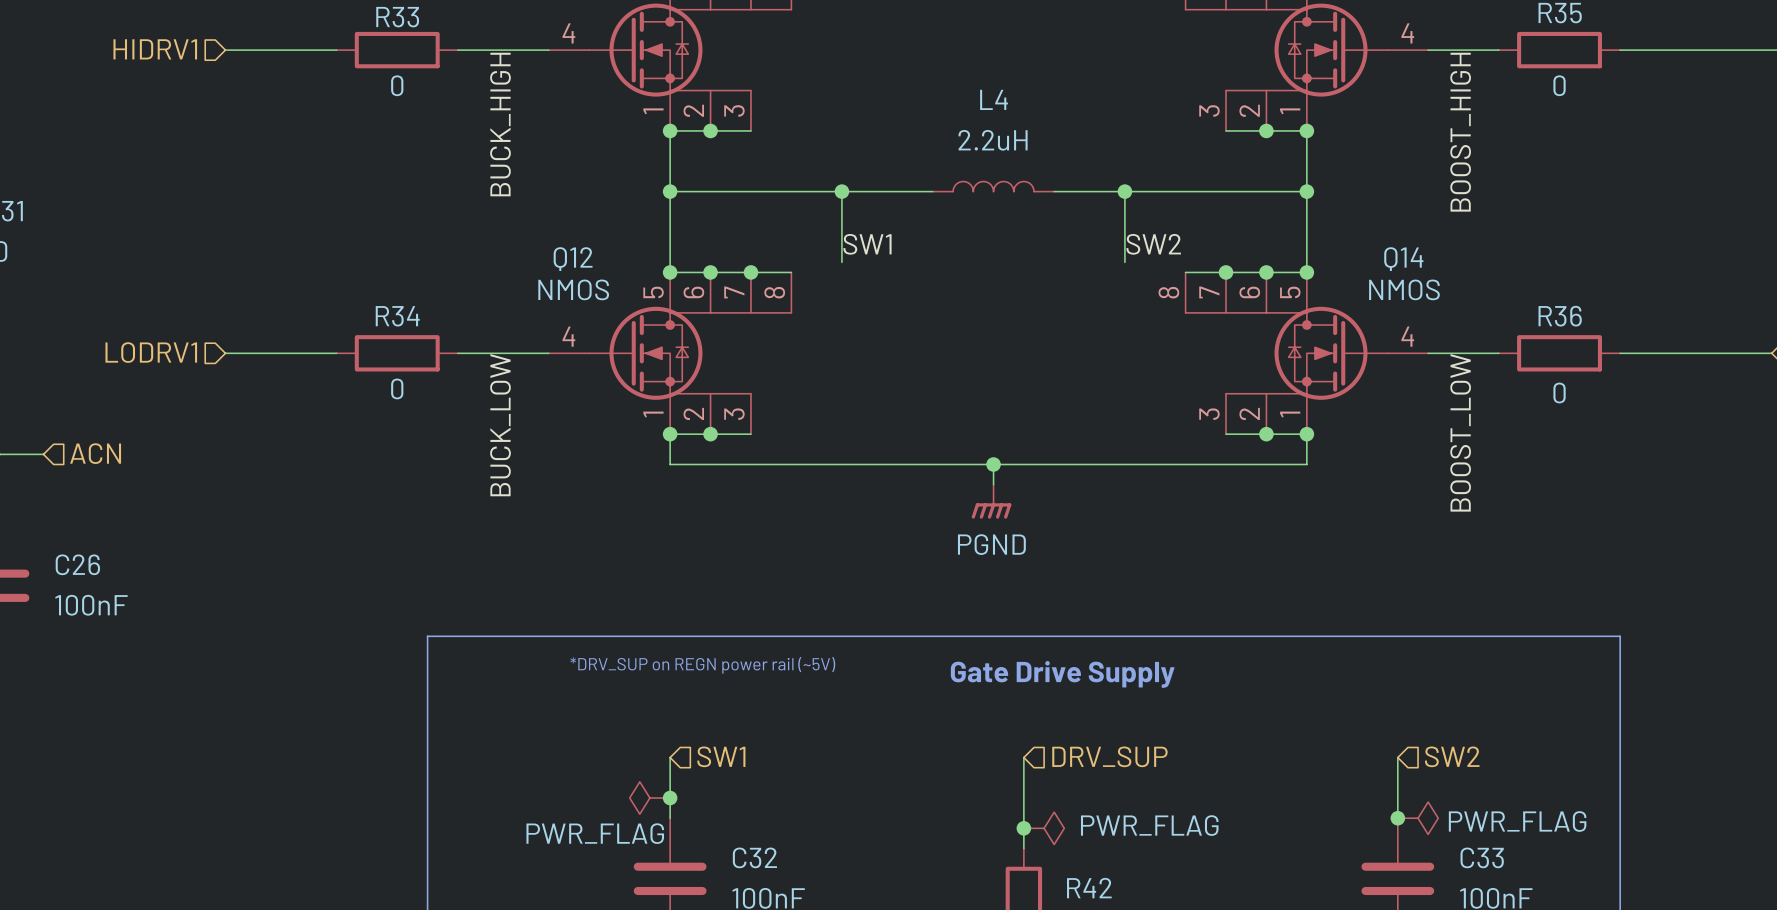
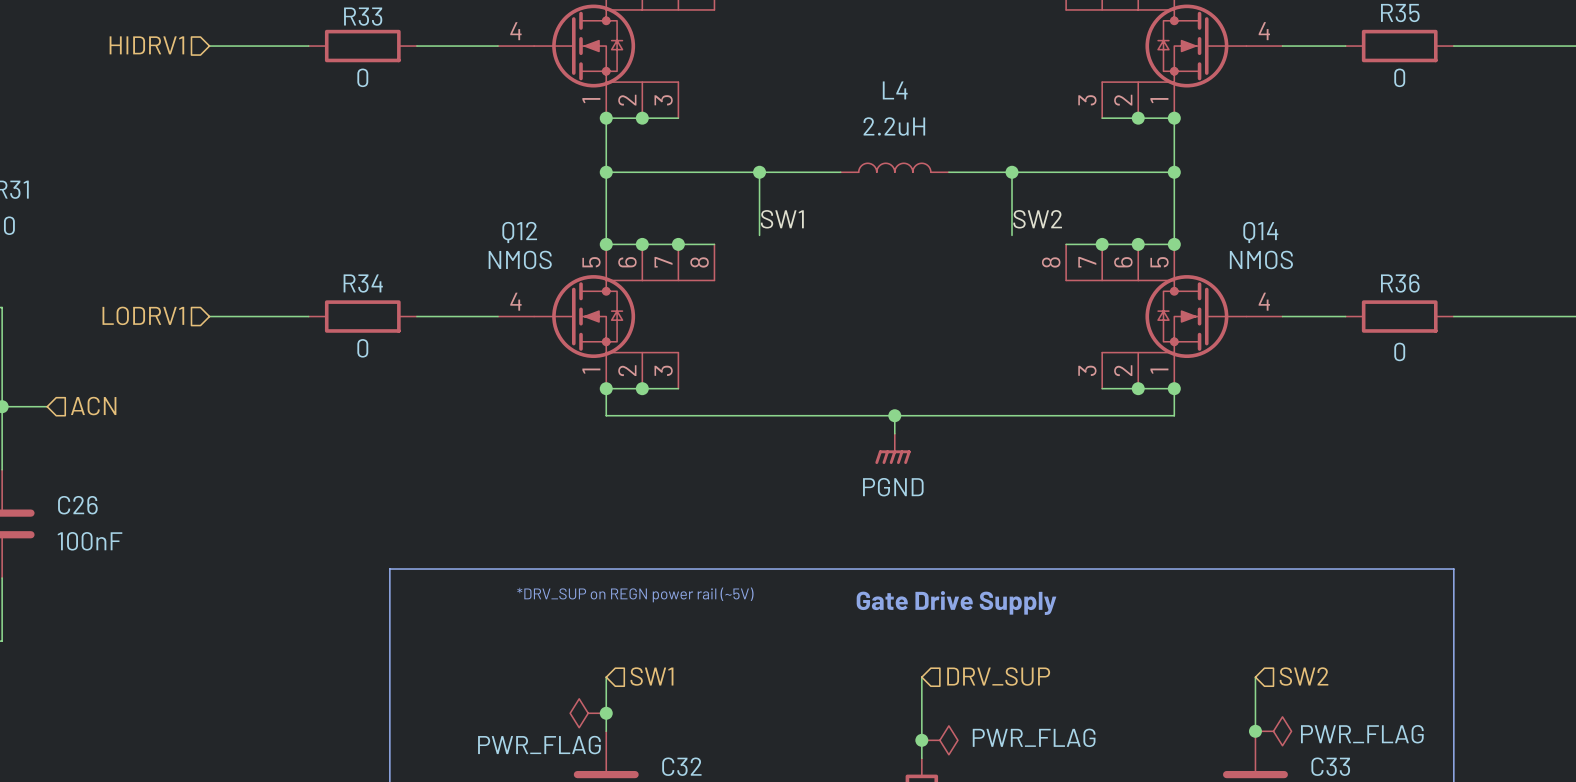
label: BUCK_HIGH (500, 124) -> none
label: BOOST_HIGH (1460, 132) -> none
label: BUCK_LOW (500, 425) -> none
label: BOOST_LOW (1460, 432) -> none

